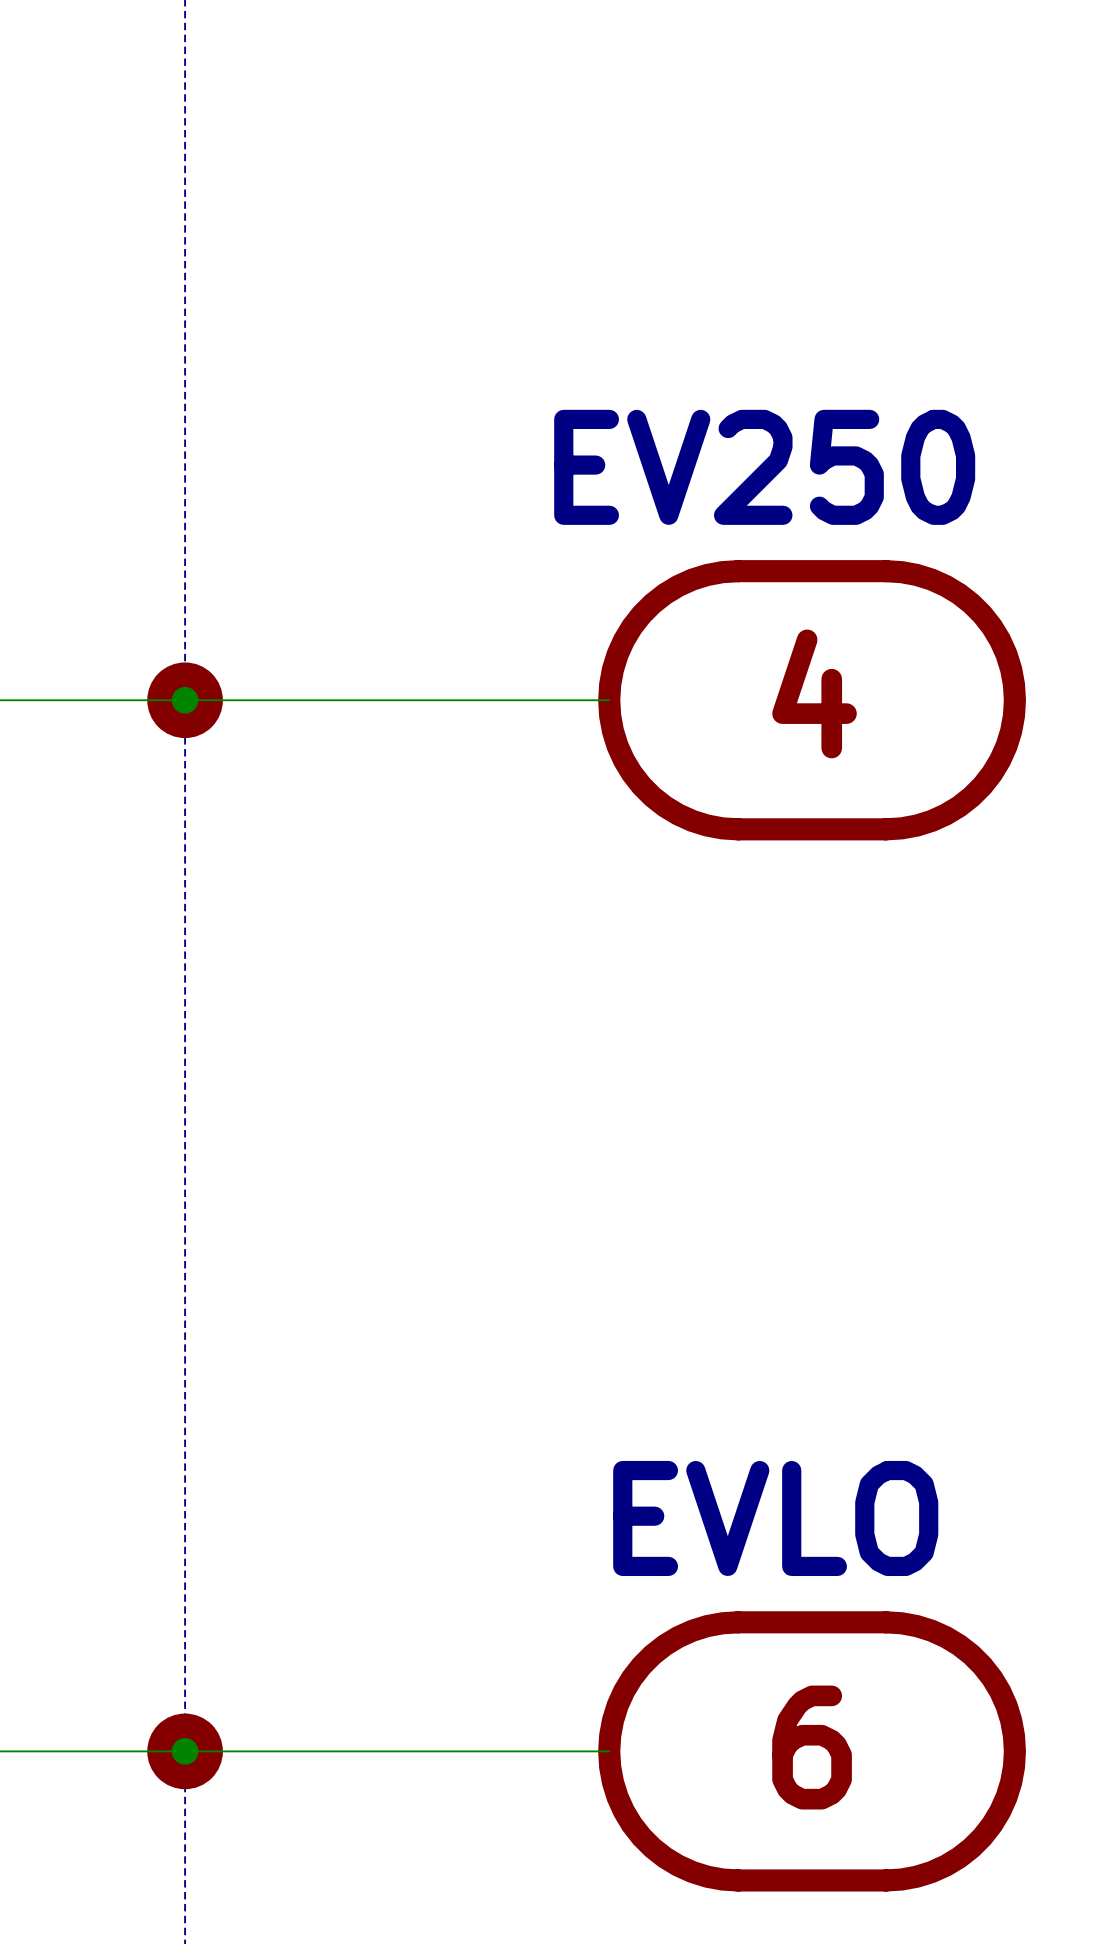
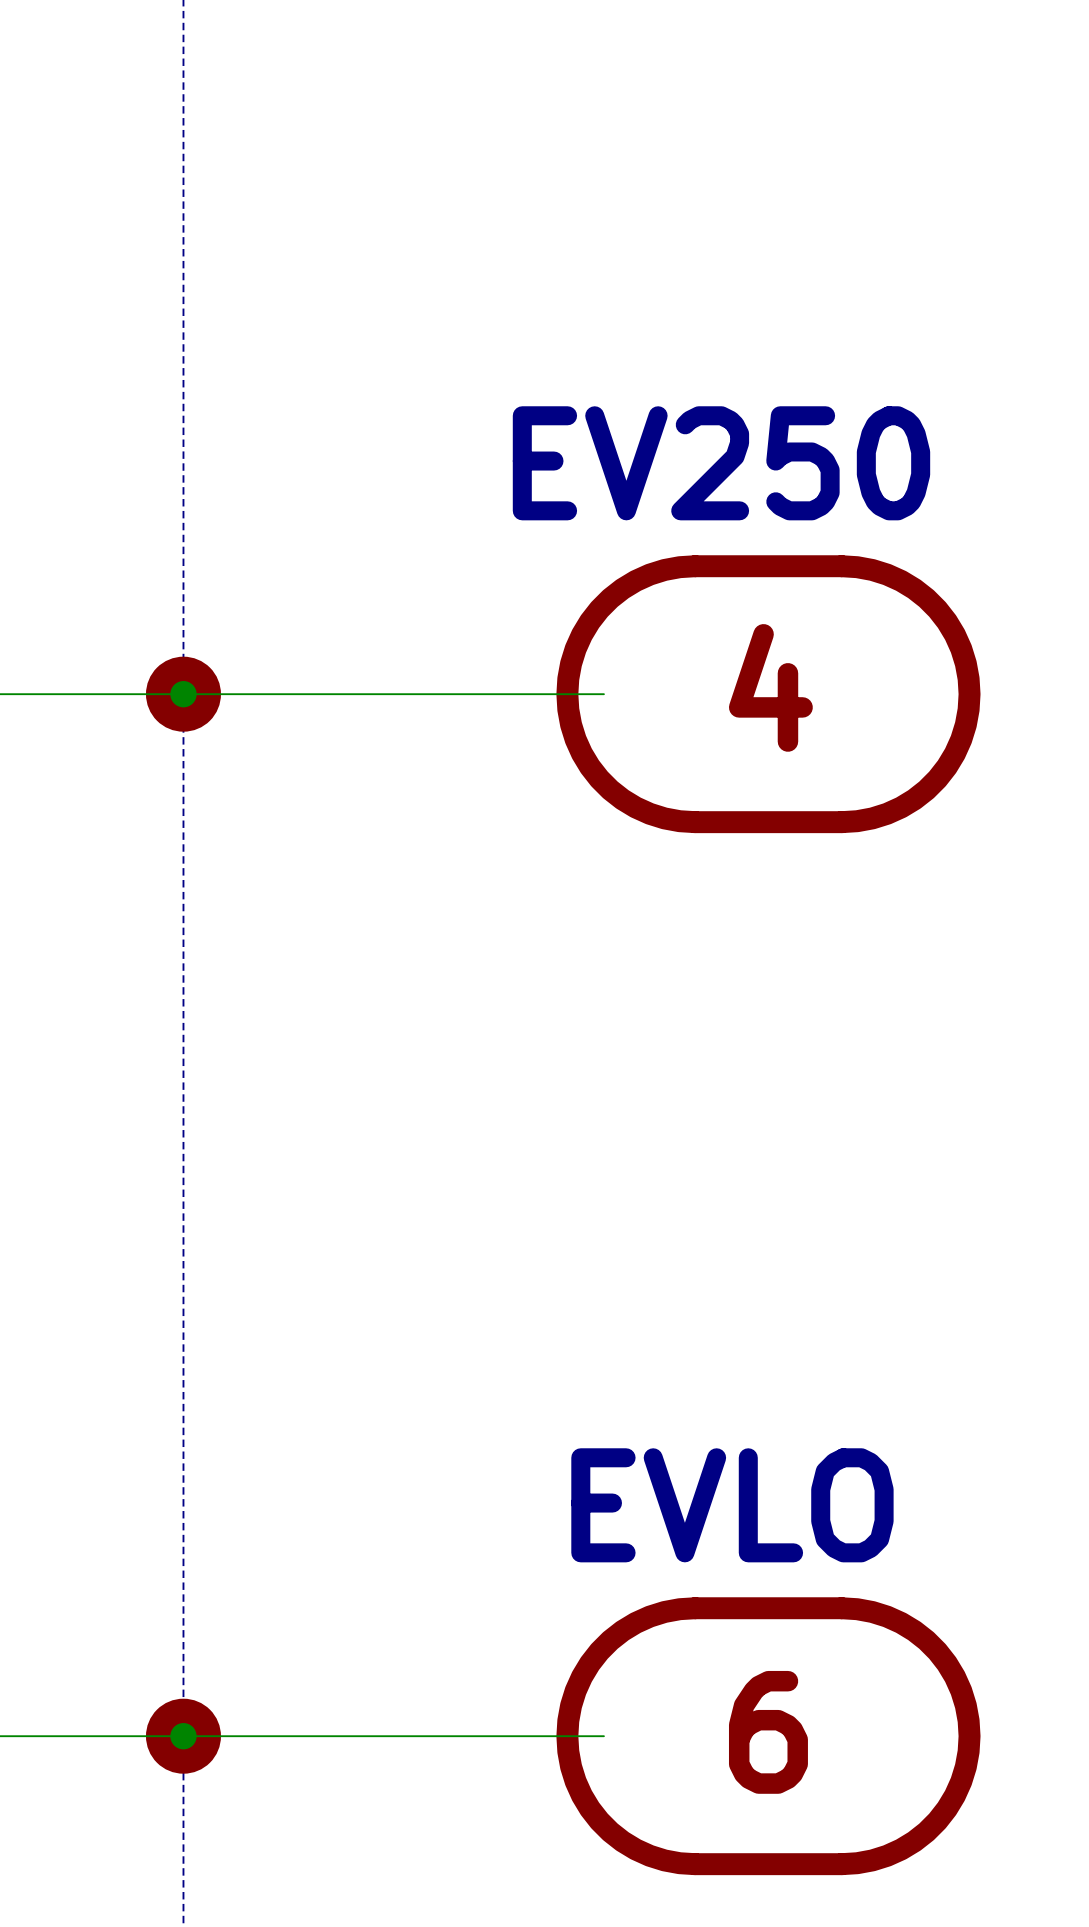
text position: EV250 (764, 467) -> EV250 (721, 463)
part position: (812, 700) -> (768, 694)
text position: EVLO (775, 1518) -> EVLO (732, 1505)
part position: (812, 1751) -> (768, 1736)

